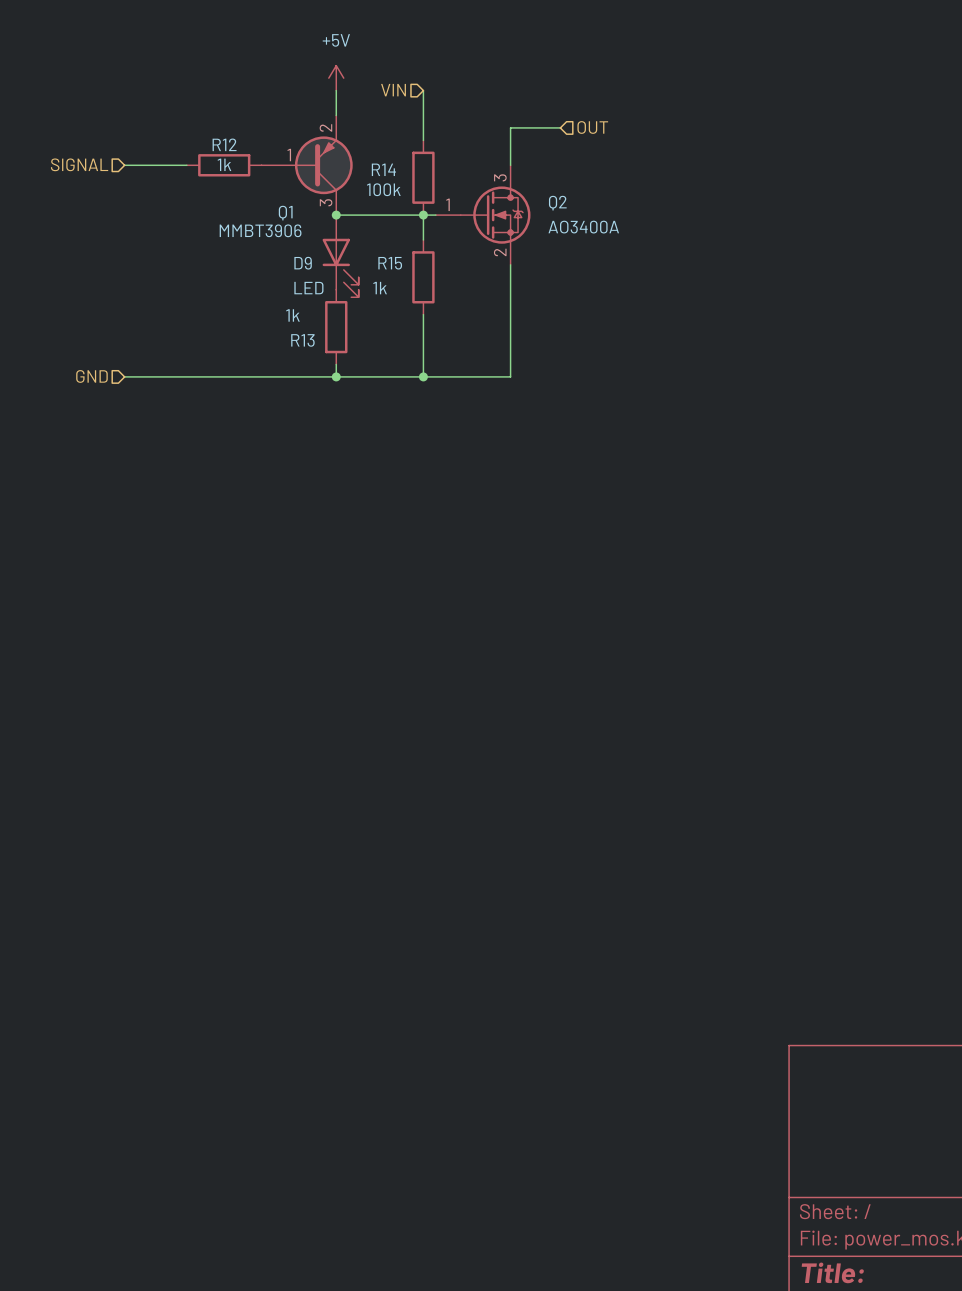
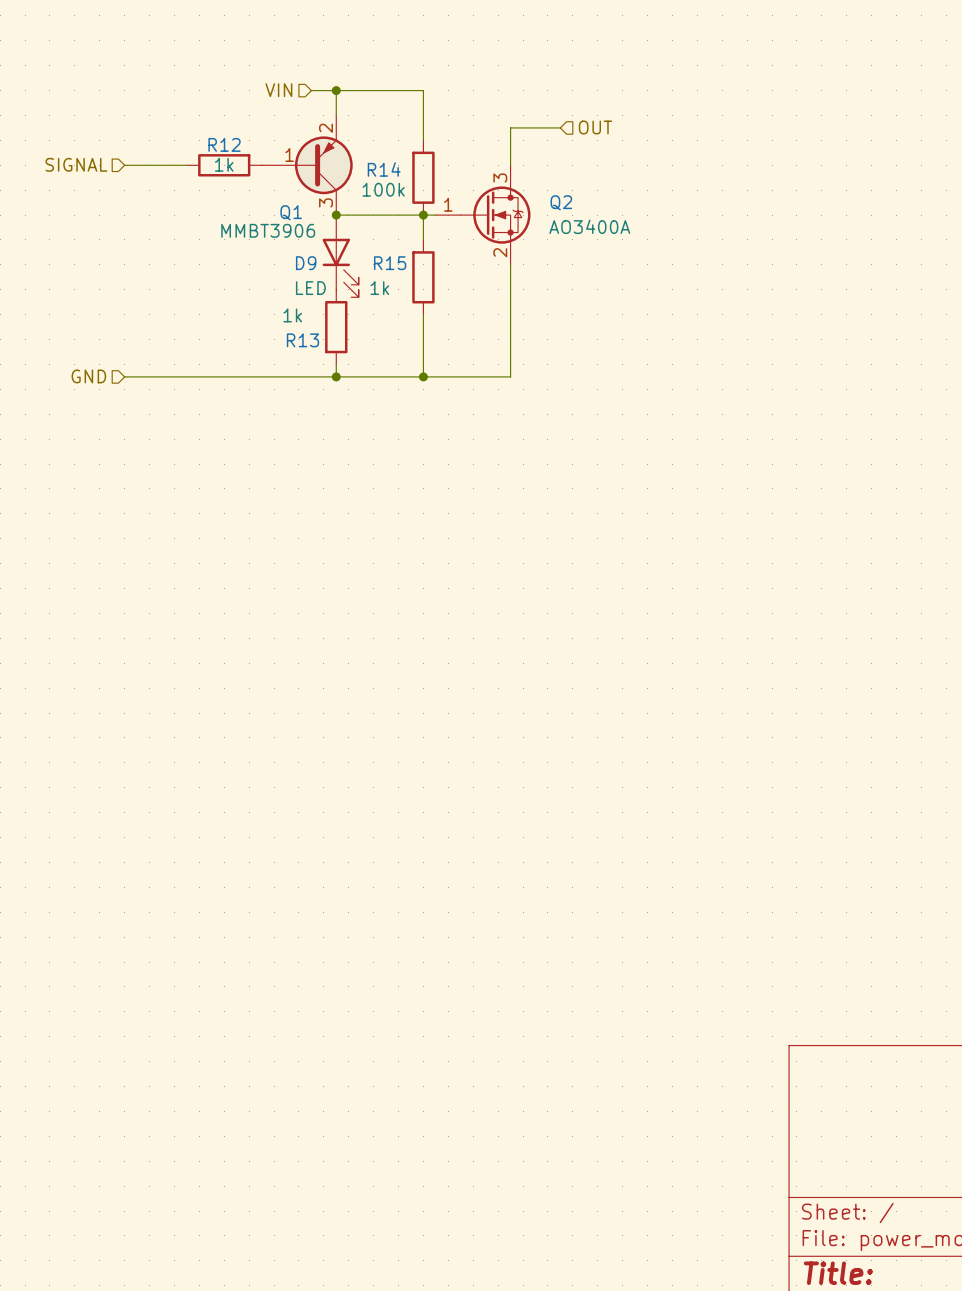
power symbol: +5V (336, 78) -> none
wire: none -> (311, 90) (423, 90)
junction: none -> (336, 90)
hierarchical label position: VIN (393, 90) -> VIN (278, 90)

